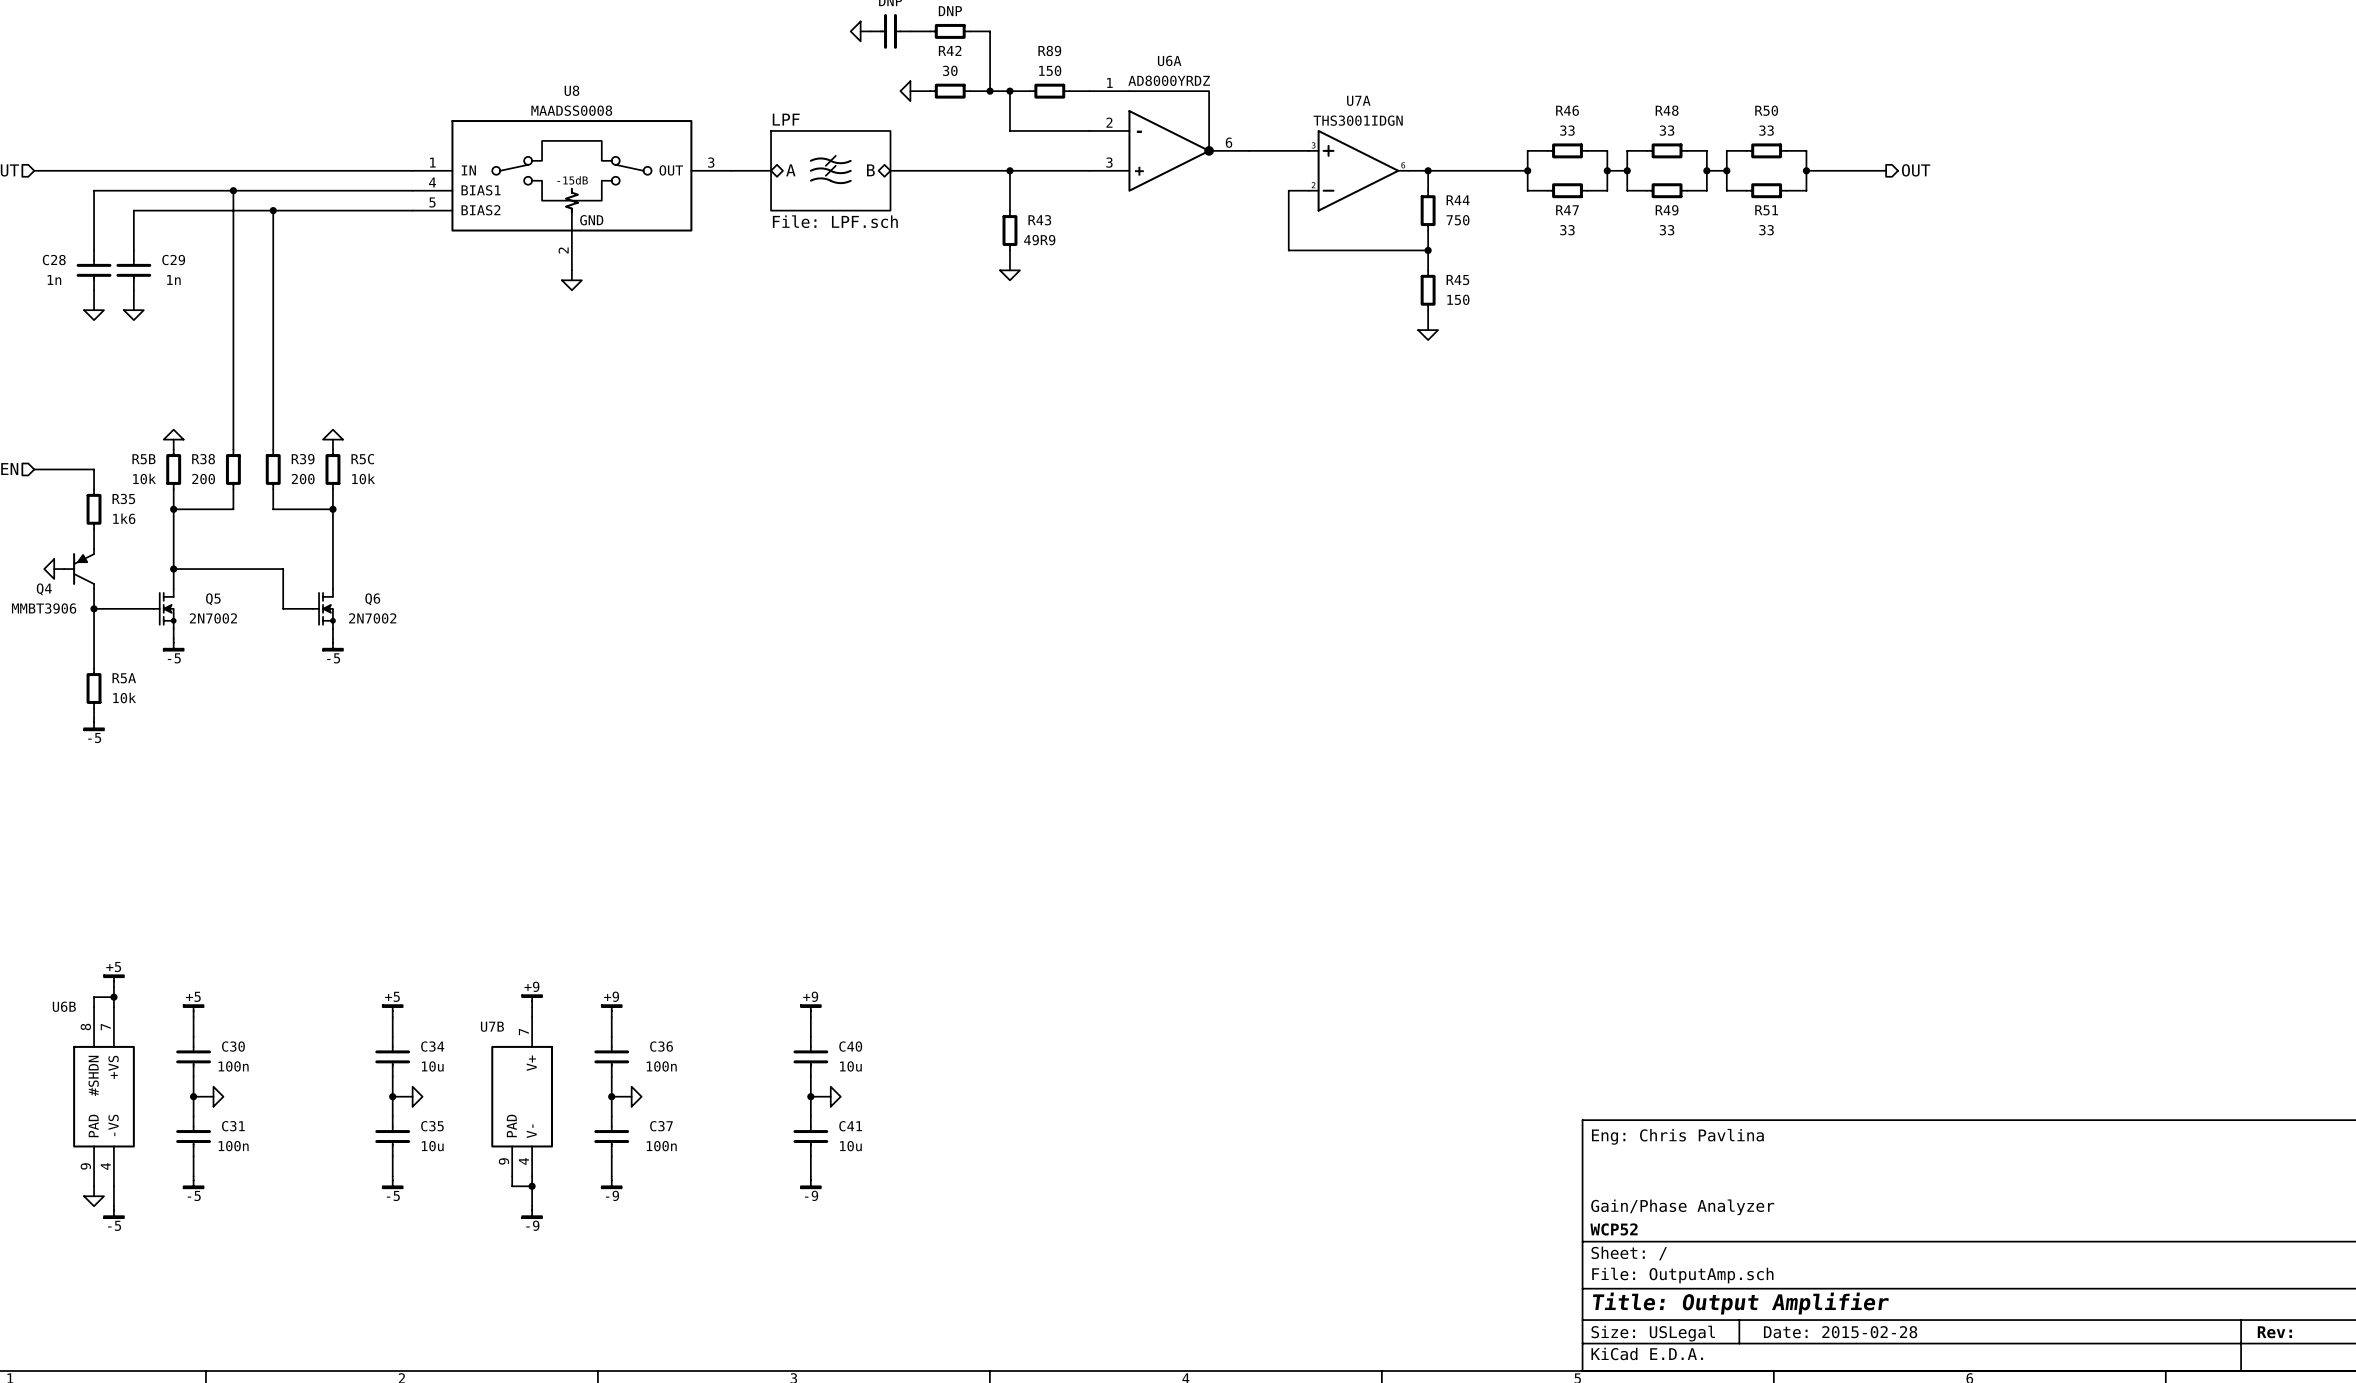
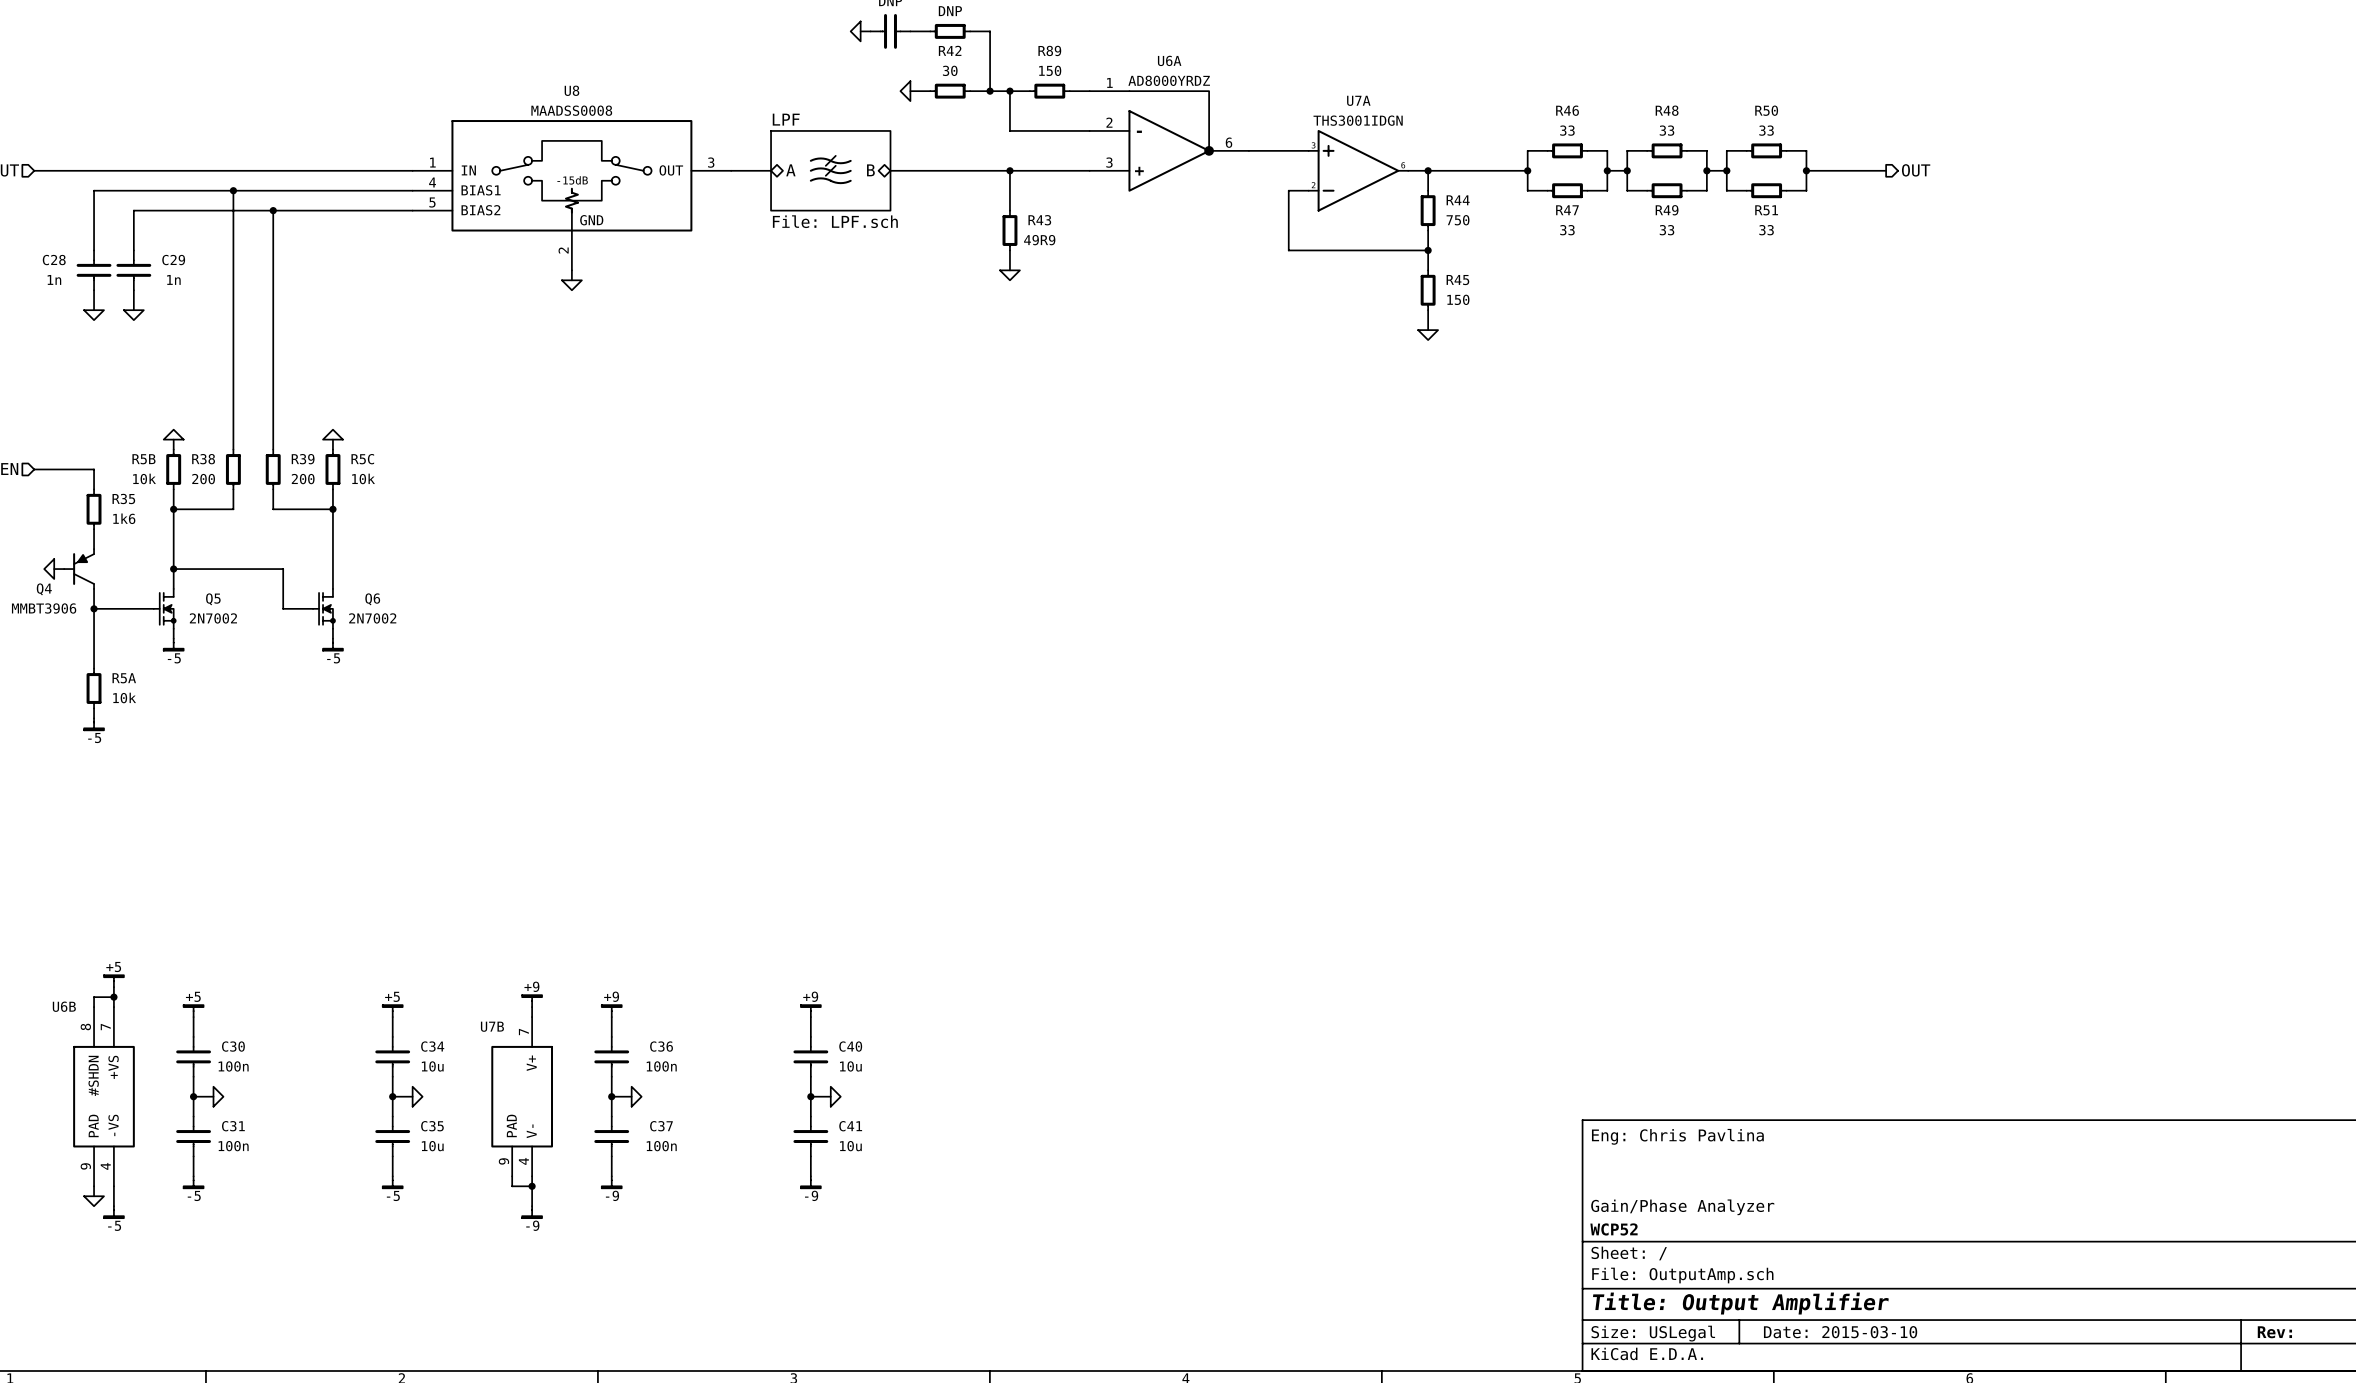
title block: Date: 2015-02-28 (1840, 1332) -> Date: 2015-03-10 (1840, 1332)

